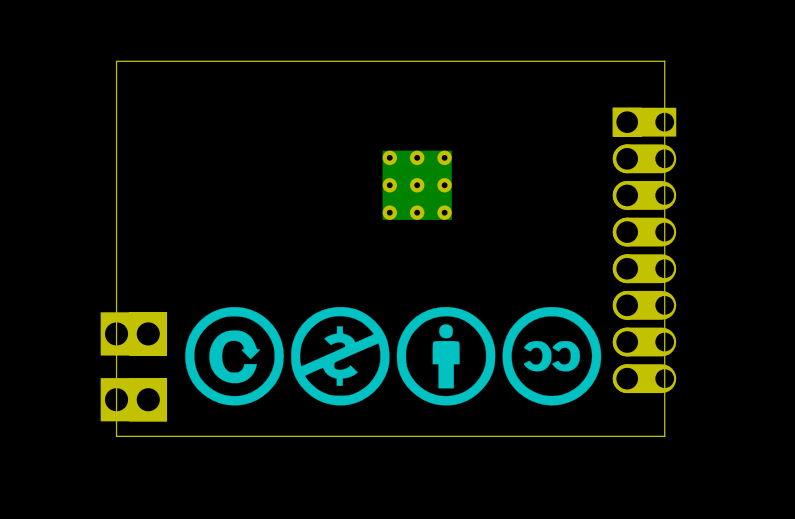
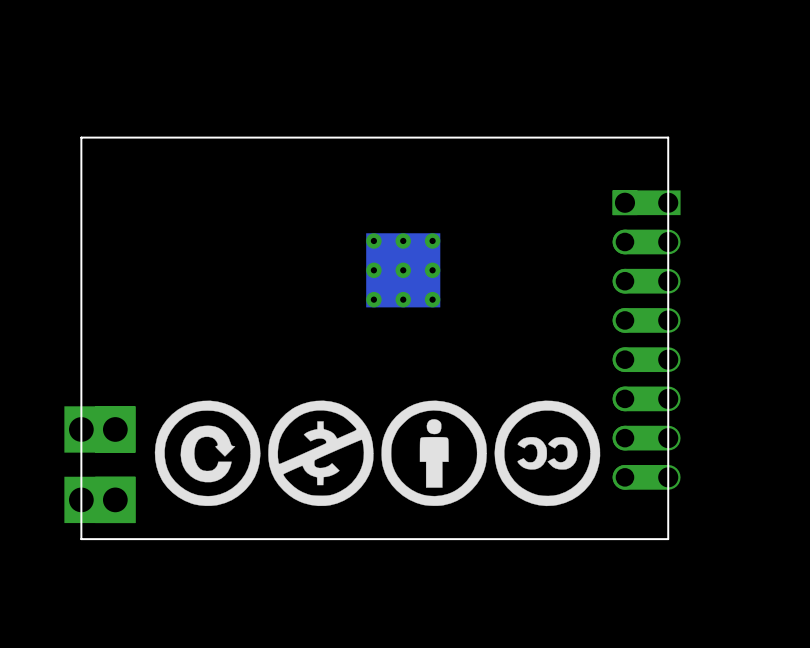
part footprint: [612, 107, 677, 137] -> [612, 190, 681, 216]
part footprint: [612, 144, 677, 174] -> [612, 229, 681, 255]
part footprint: [612, 181, 677, 210] -> [612, 268, 681, 294]
part footprint: [612, 217, 677, 247] -> [612, 308, 681, 333]
part footprint: [612, 254, 677, 284] -> [612, 347, 681, 373]
part footprint: [612, 290, 677, 320] -> [612, 386, 681, 412]
part footprint: [612, 327, 677, 357] -> [612, 425, 681, 451]
part footprint: [612, 364, 677, 394] -> [612, 464, 681, 490]

